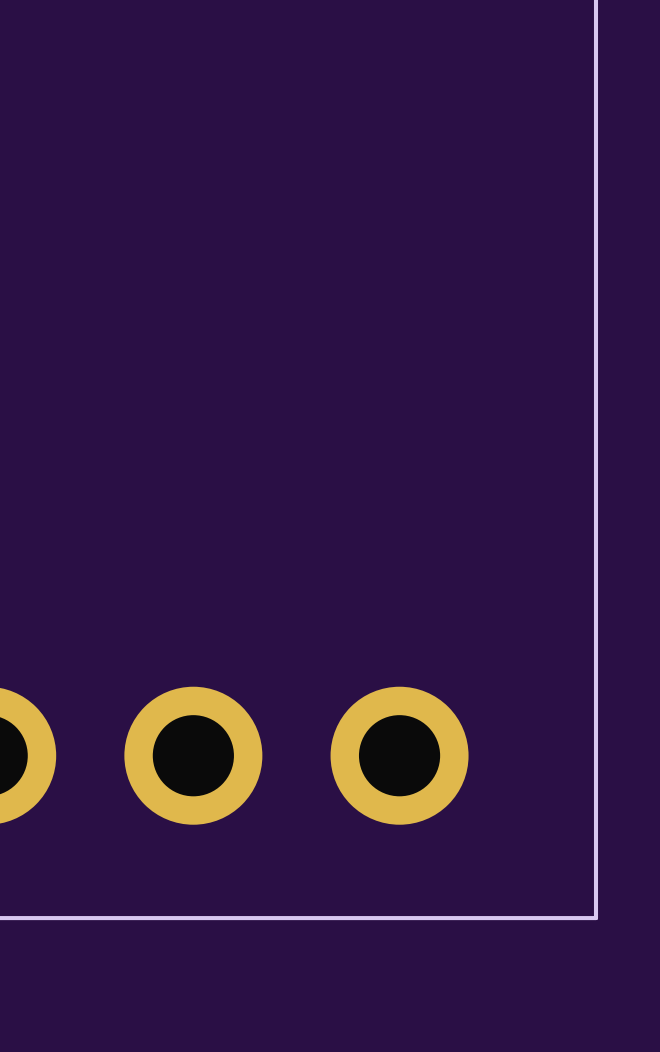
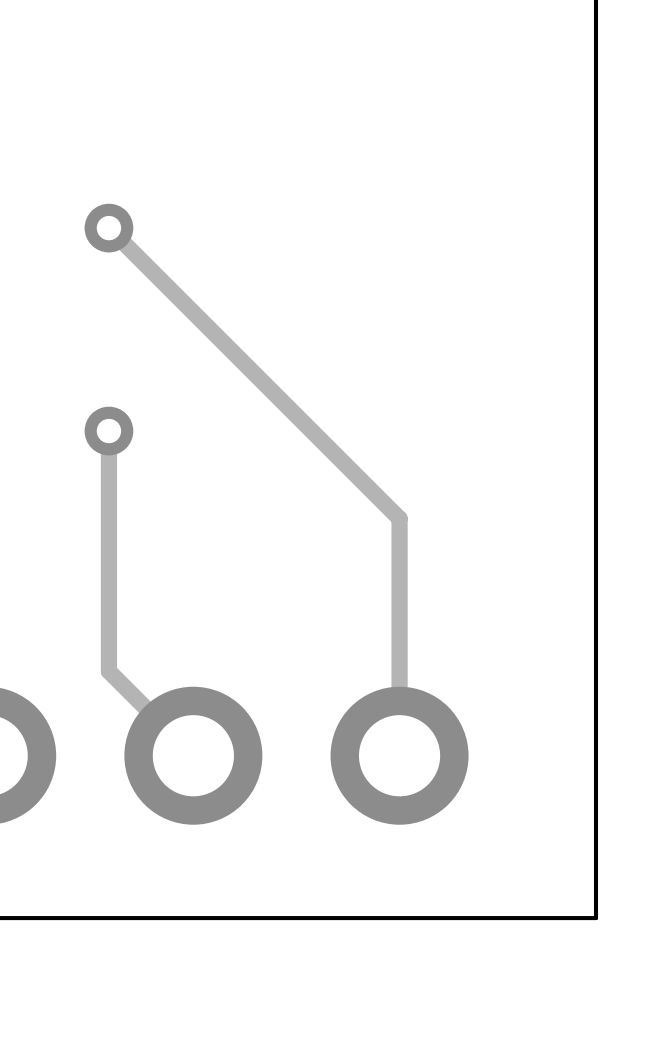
track: none -> (108, 228) (399, 518) (399, 755)
via: none -> (108, 228)
track: none -> (108, 431) (108, 671) (193, 755)
via: none -> (108, 431)

